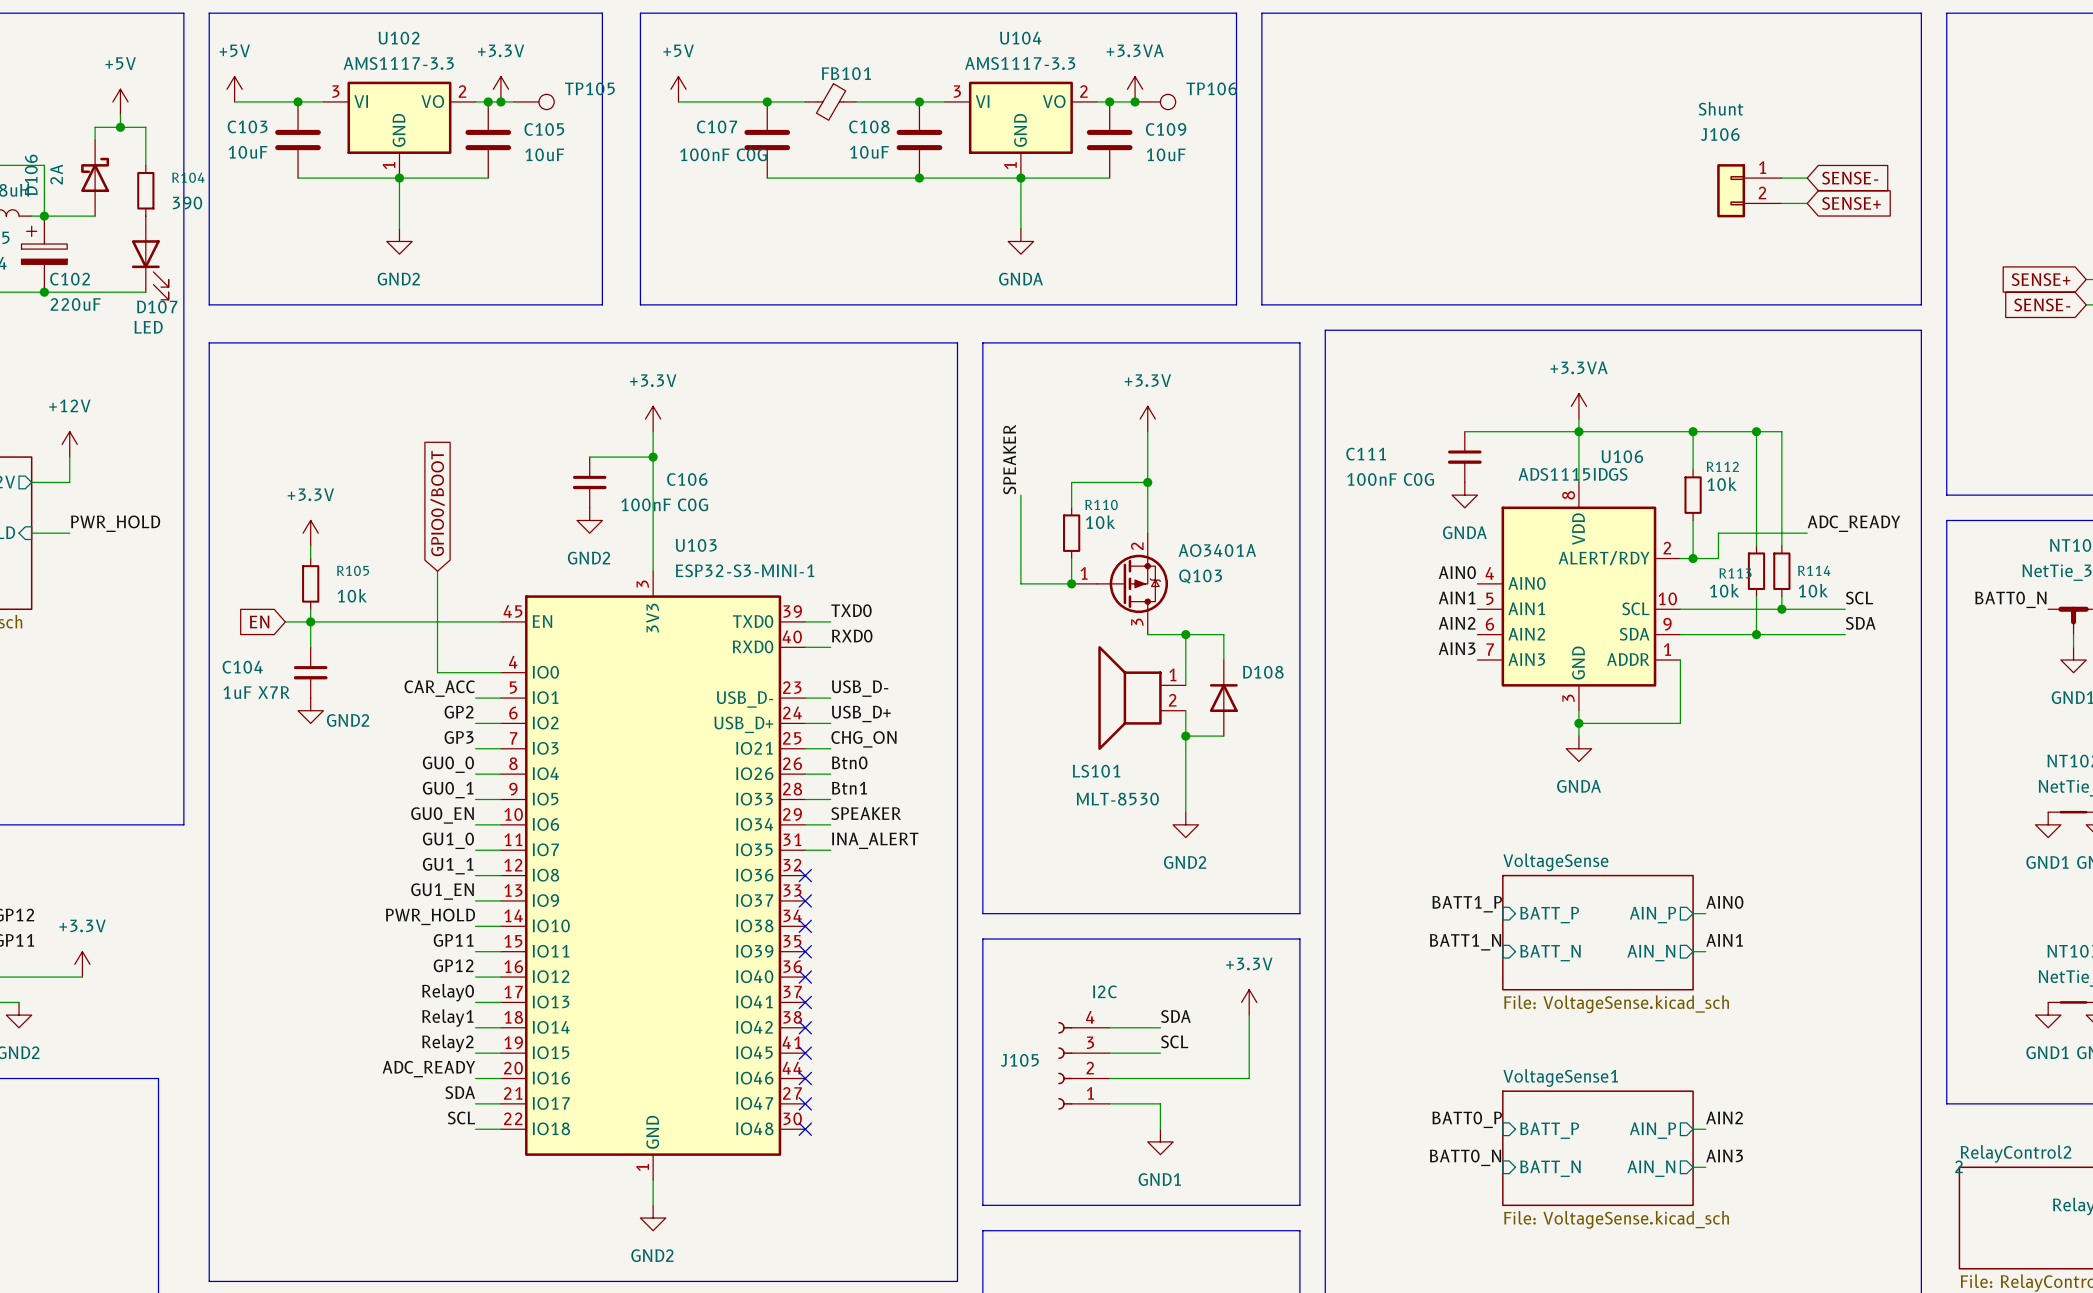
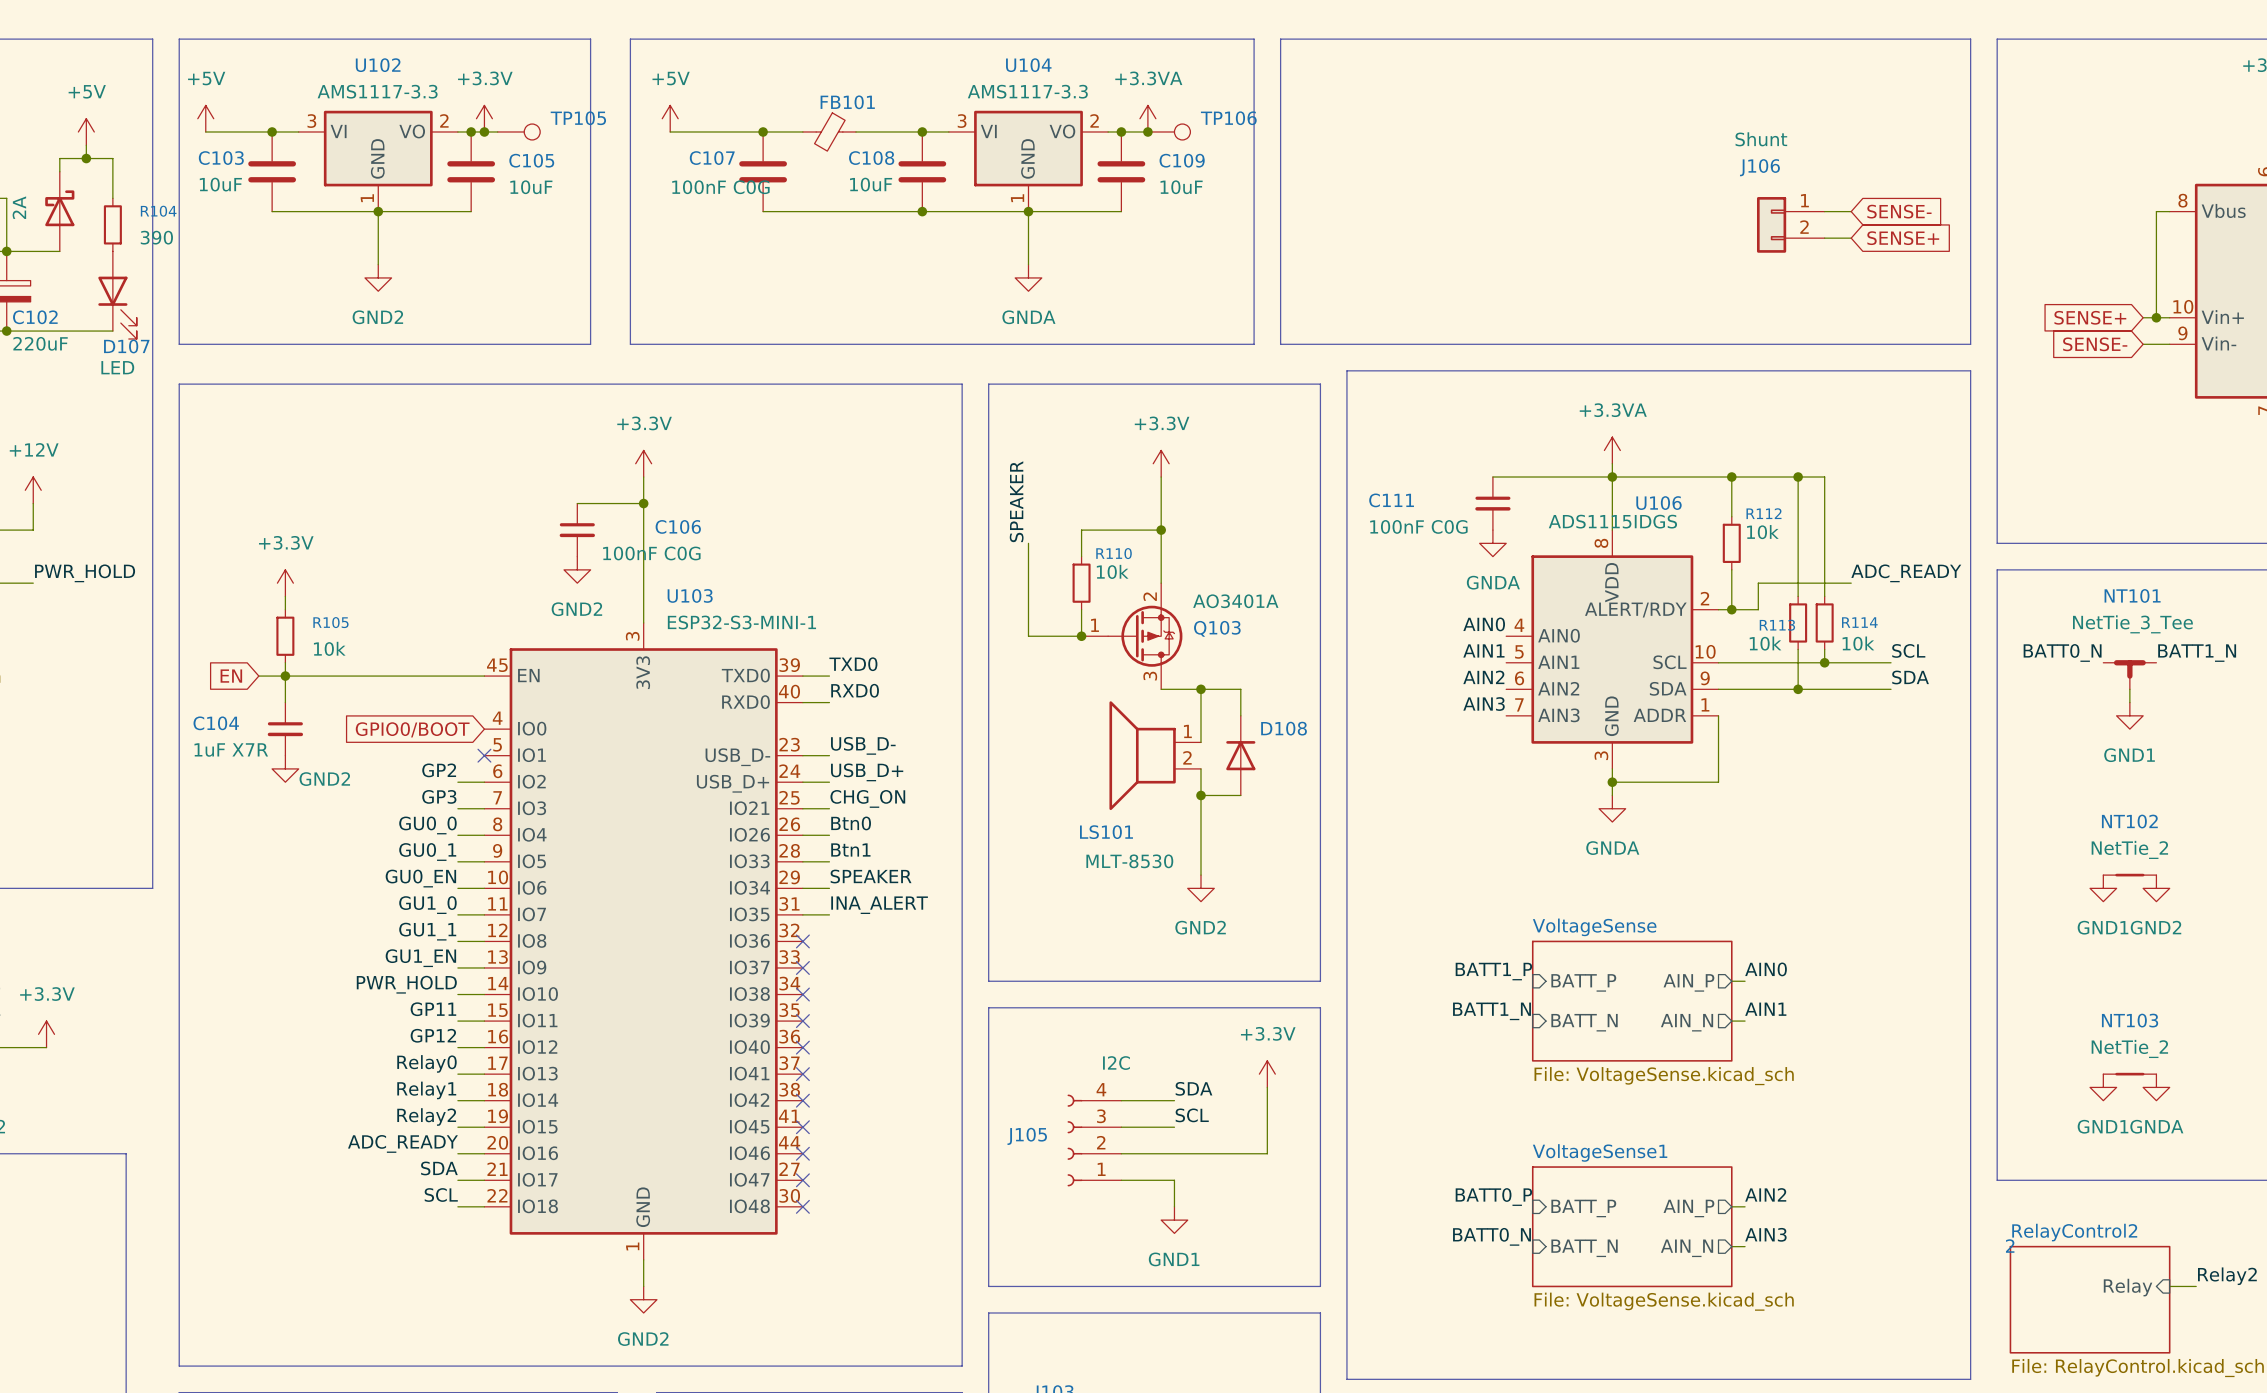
global label rotation: 0° (437, 503) -> 90° counterclockwise (412, 729)
global label position: GPIO0/BOOT (437, 503) -> GPIO0/BOOT (412, 729)
wire: (437, 571) (437, 672) (500, 672) -> none
label: CAR_ACC (439, 688) -> none
wire: (475, 698) (500, 698) -> none
no-connect mark: none -> (484, 755)

